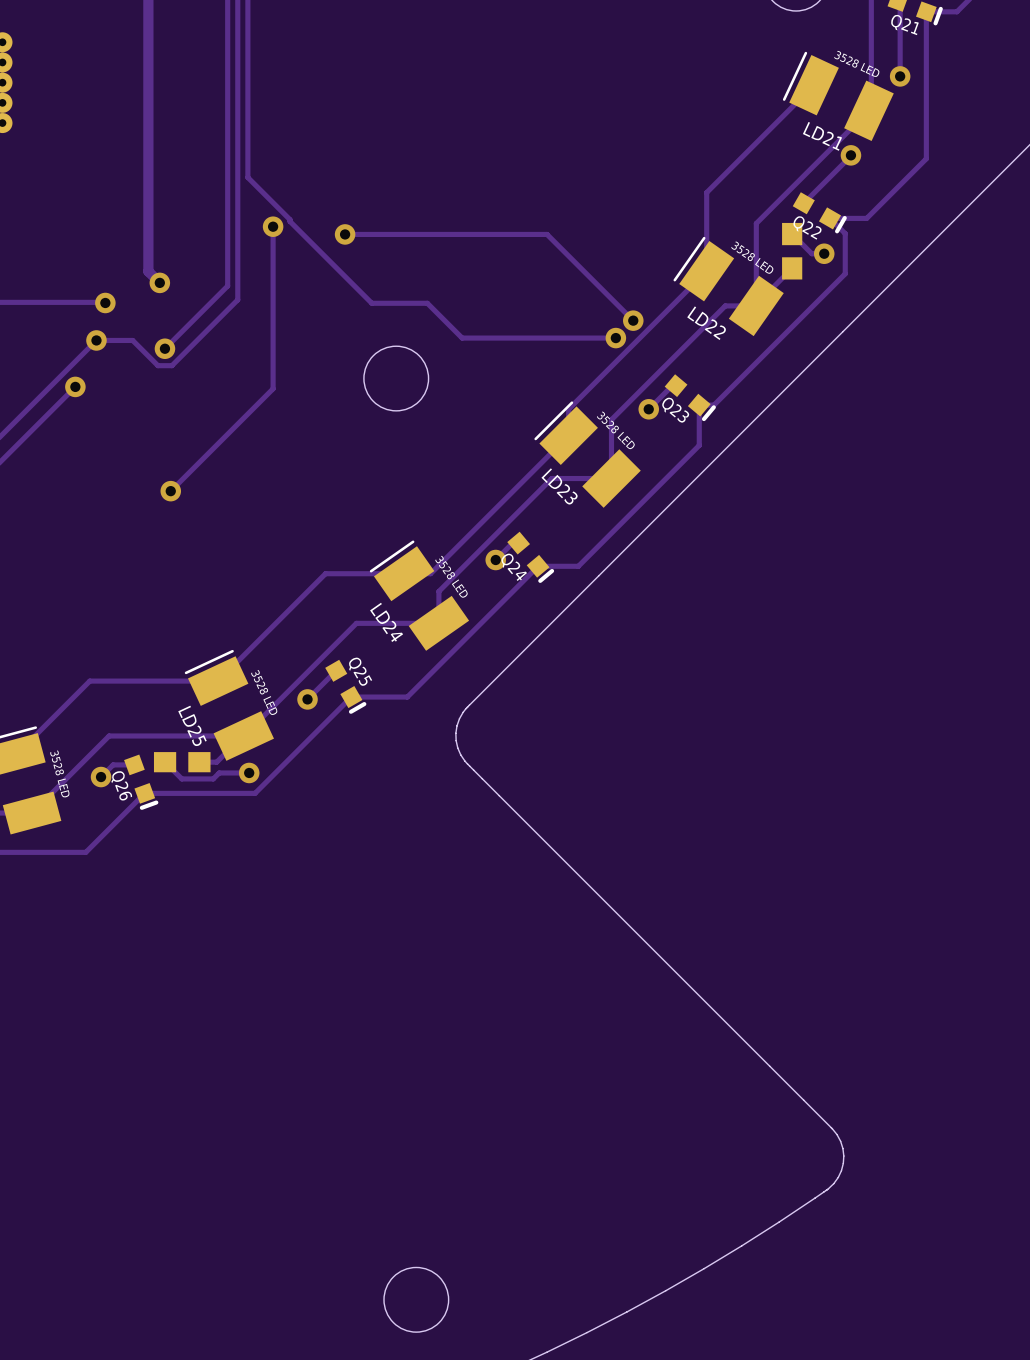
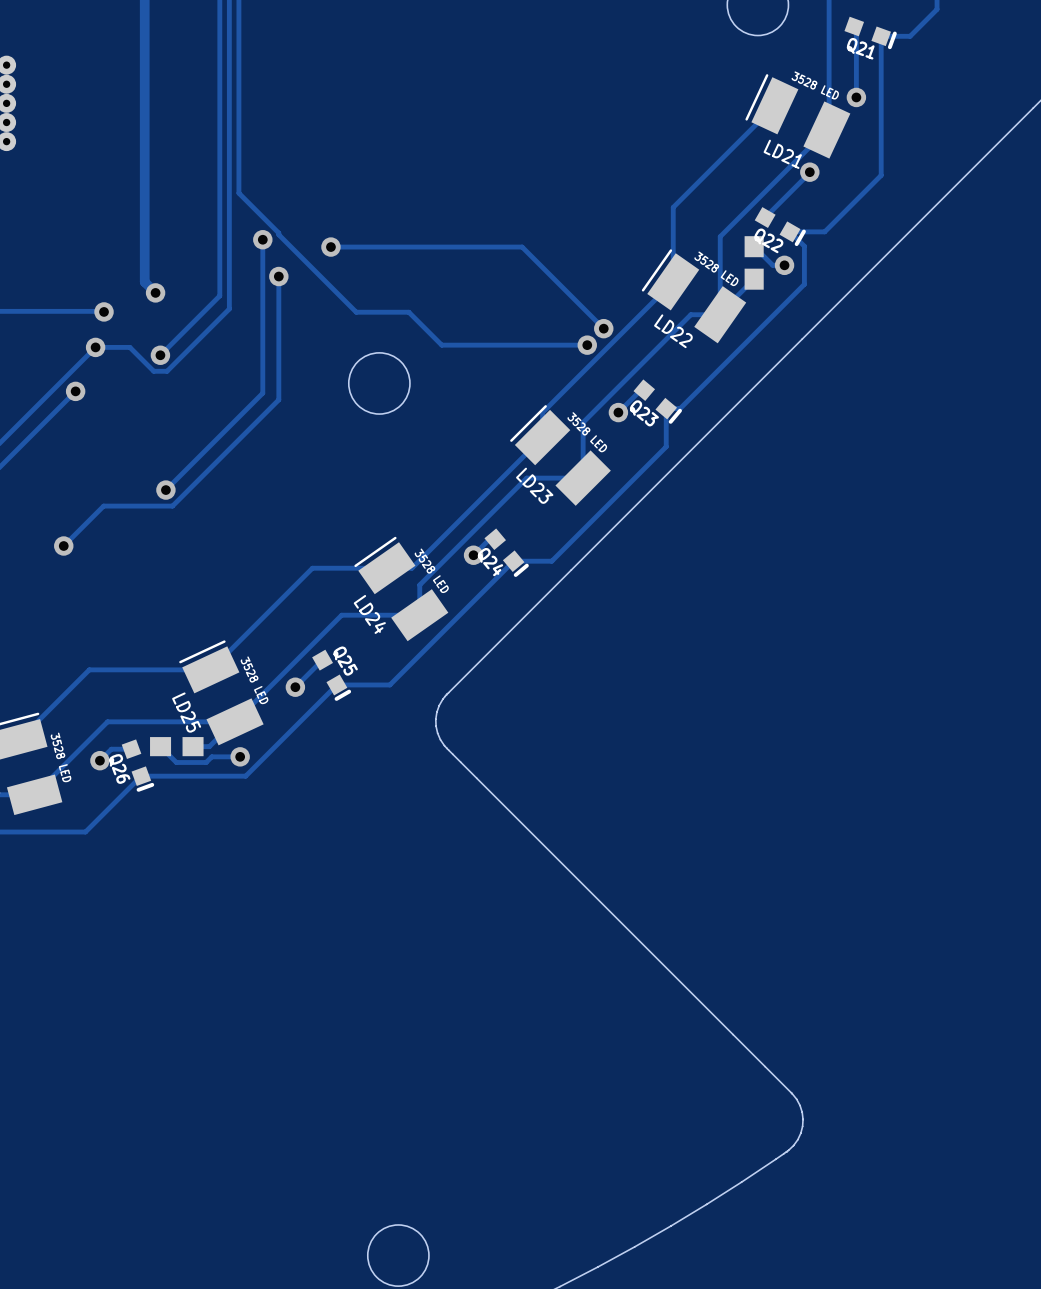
track: none -> (278, 276) (278, 399) (172, 506) (103, 506) (63, 546)
via: none -> (278, 276)
via: none -> (63, 546)

